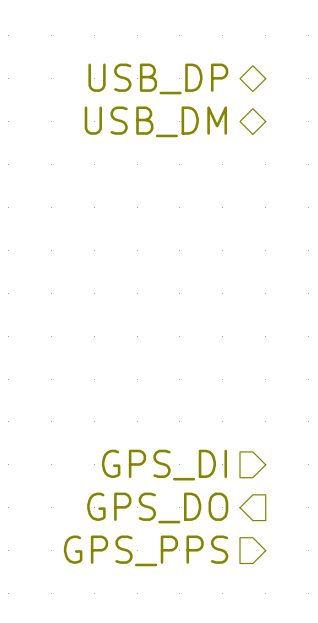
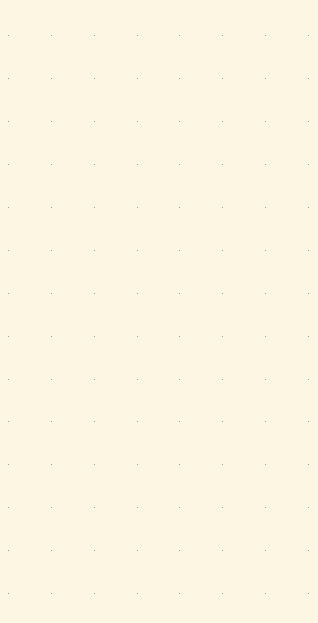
hierarchical label: USB_DP (158, 78) -> none
hierarchical label: USB_DM (155, 121) -> none
hierarchical label: GPS_DI (164, 465) -> none
hierarchical label: GPS_DO (157, 507) -> none
hierarchical label: GPS_PPS (146, 550) -> none

